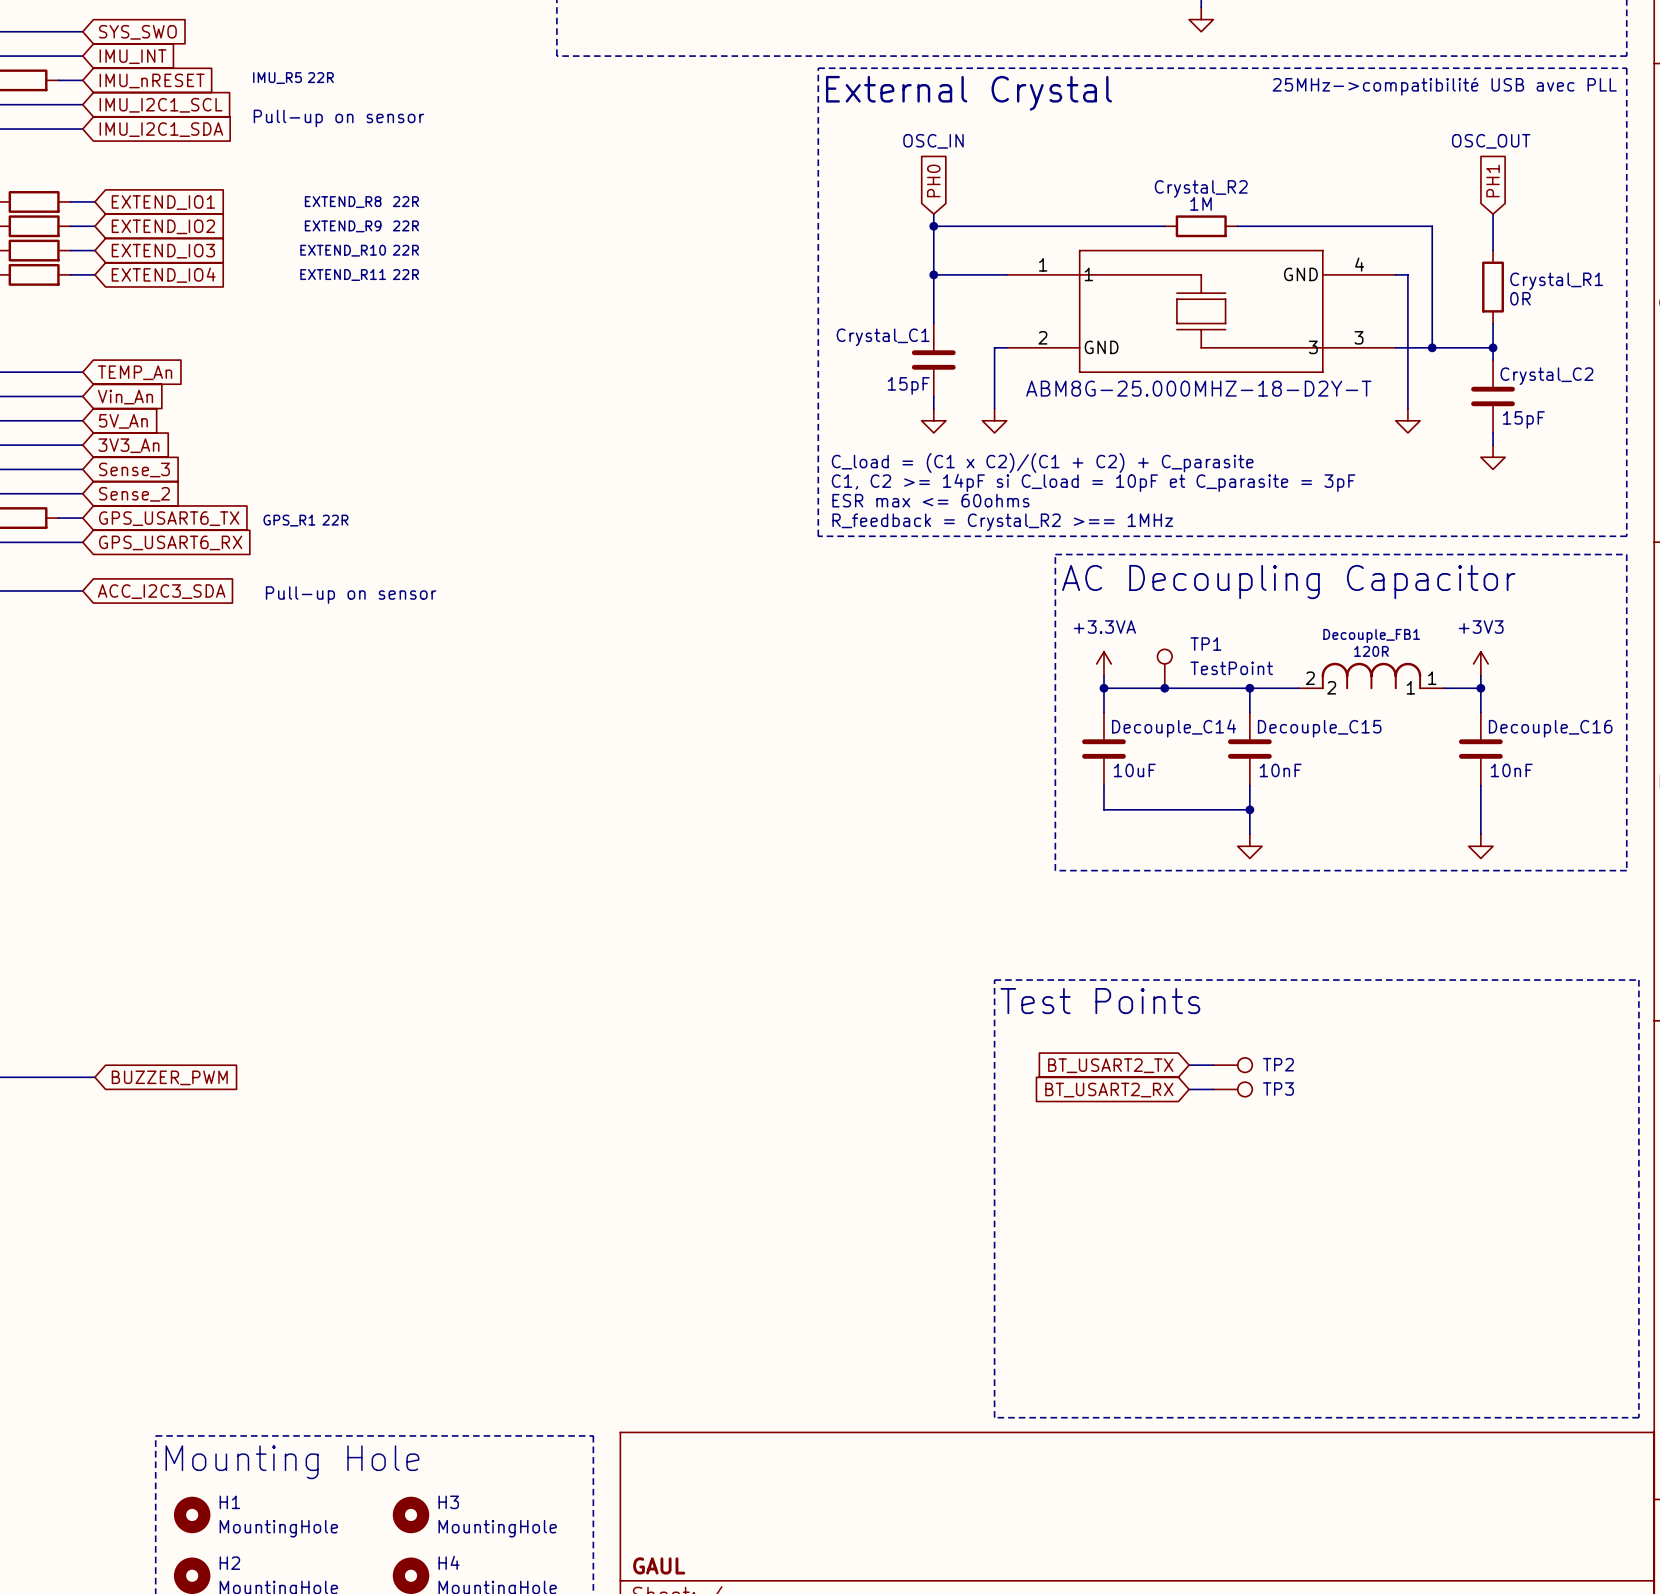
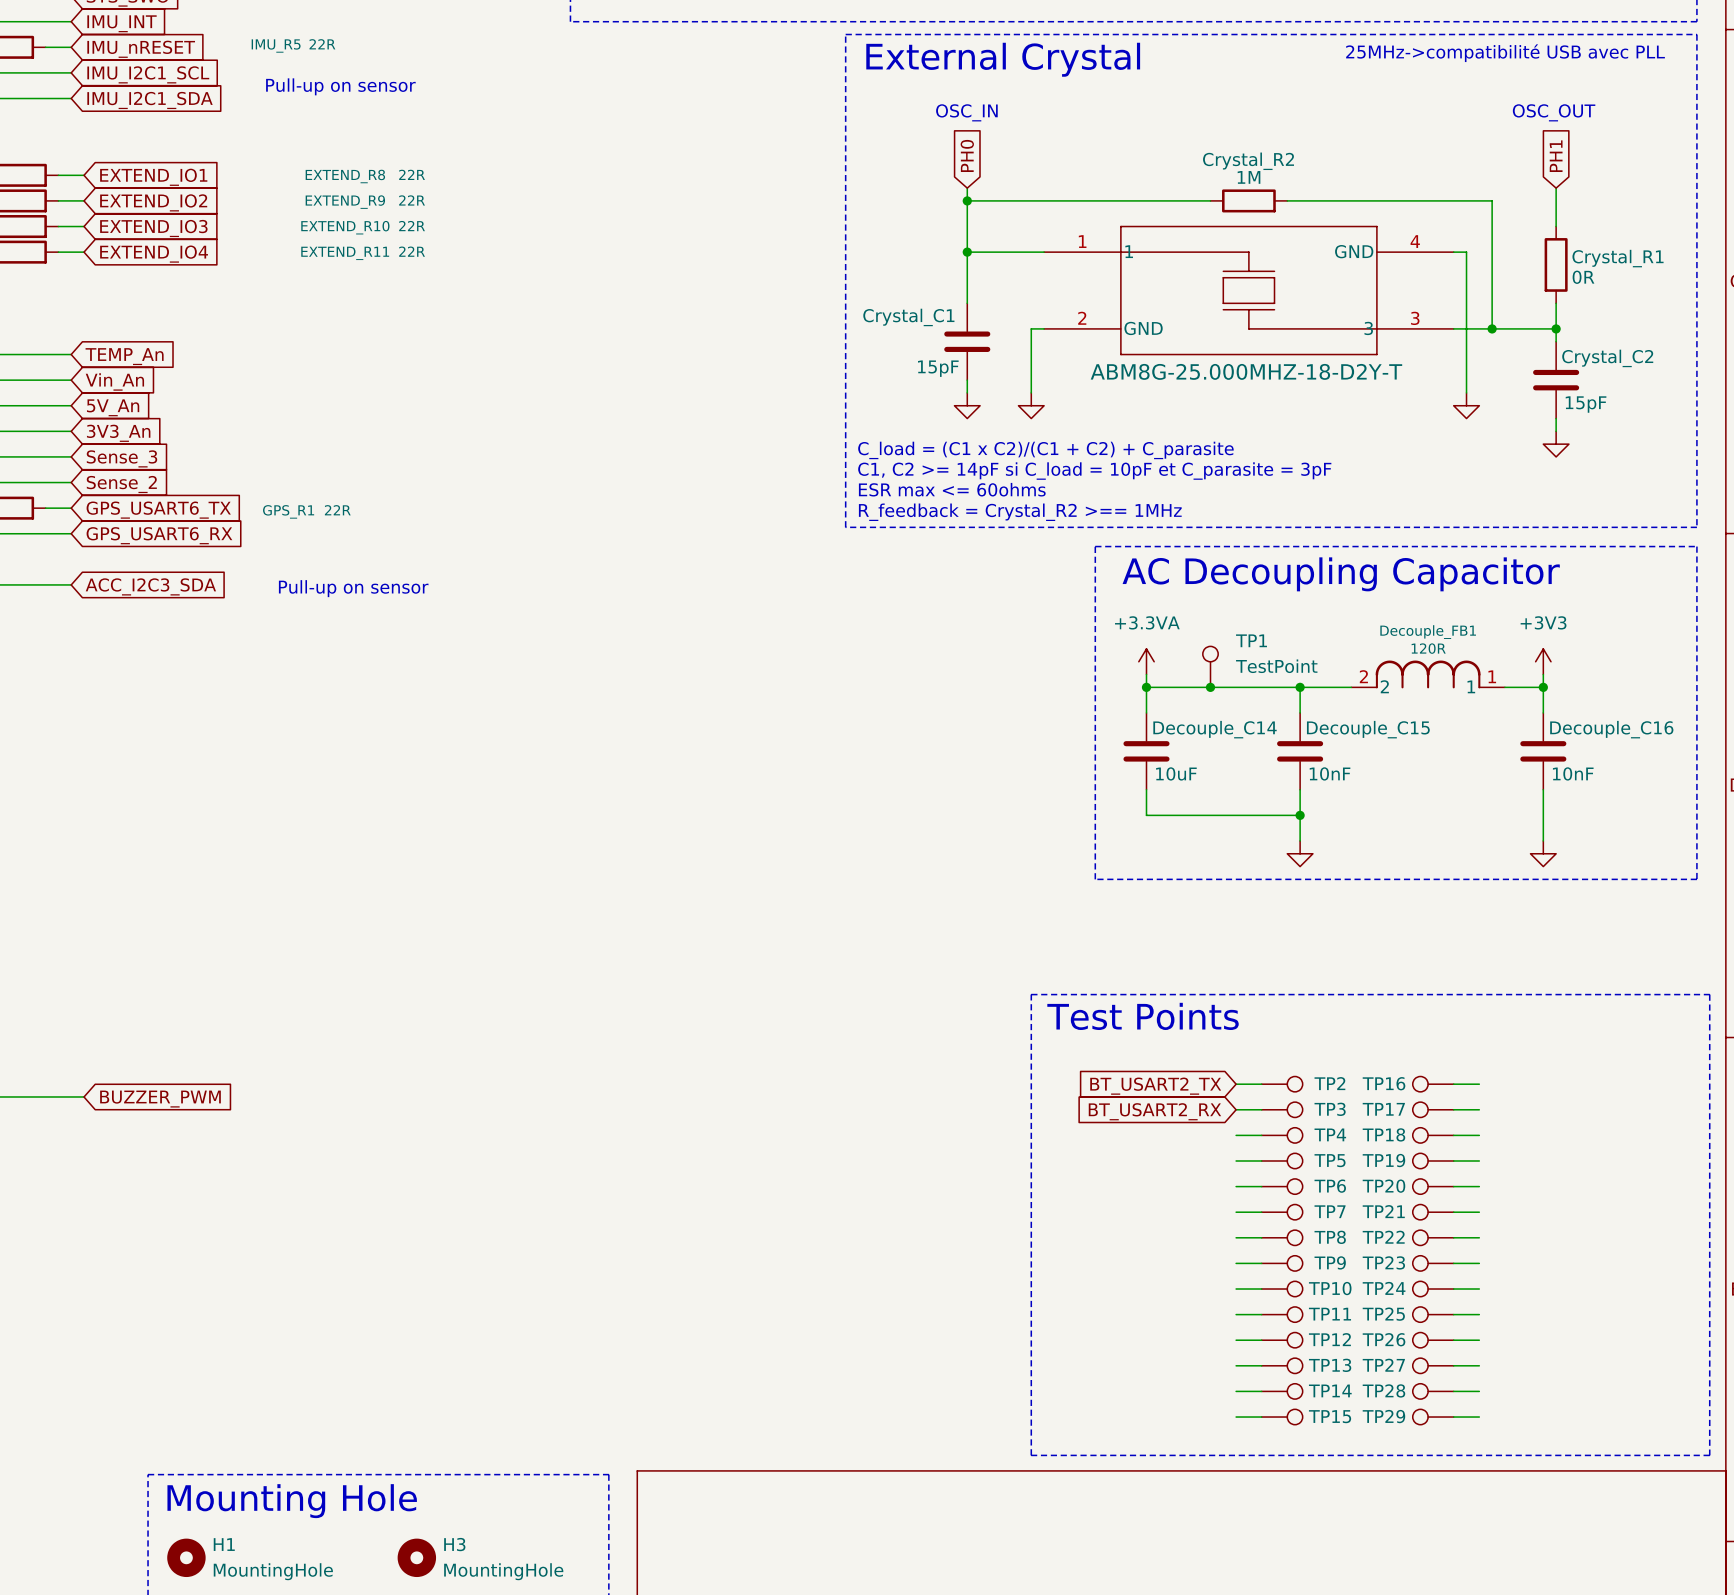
TP16: none -> (1433, 1084)
wire: none -> (1453, 1084) (1479, 1084)
TP17: none -> (1433, 1109)
wire: none -> (1453, 1109) (1479, 1109)
wire: none -> (1236, 1135) (1261, 1135)
TP4: none -> (1282, 1135)
TP18: none -> (1433, 1135)
wire: none -> (1453, 1135) (1479, 1135)
wire: none -> (1236, 1160) (1261, 1160)
TP5: none -> (1282, 1160)
TP19: none -> (1433, 1160)
wire: none -> (1453, 1160) (1479, 1160)
wire: none -> (1236, 1186) (1261, 1186)
TP6: none -> (1282, 1186)
TP20: none -> (1433, 1186)
wire: none -> (1453, 1186) (1479, 1186)
wire: none -> (1236, 1212) (1261, 1212)
TP7: none -> (1282, 1212)
TP21: none -> (1433, 1212)
wire: none -> (1453, 1212) (1479, 1212)
wire: none -> (1236, 1237) (1261, 1237)
TP8: none -> (1282, 1237)
TP22: none -> (1433, 1237)
wire: none -> (1453, 1237) (1479, 1237)
wire: none -> (1236, 1263) (1261, 1263)
TP9: none -> (1282, 1263)
TP23: none -> (1433, 1263)
wire: none -> (1453, 1263) (1479, 1263)
wire: none -> (1236, 1289) (1261, 1289)
TP10: none -> (1282, 1289)
TP24: none -> (1433, 1289)
wire: none -> (1453, 1289) (1479, 1289)
wire: none -> (1236, 1314) (1261, 1314)
TP11: none -> (1282, 1314)
TP25: none -> (1433, 1314)
wire: none -> (1453, 1314) (1479, 1314)
wire: none -> (1236, 1340) (1261, 1340)
TP12: none -> (1282, 1340)
TP26: none -> (1433, 1340)
wire: none -> (1453, 1340) (1479, 1340)
wire: none -> (1236, 1365) (1261, 1365)
TP13: none -> (1282, 1365)
TP27: none -> (1433, 1365)
wire: none -> (1453, 1365) (1479, 1365)
wire: none -> (1236, 1391) (1261, 1391)
TP14: none -> (1282, 1391)
TP28: none -> (1433, 1391)
wire: none -> (1453, 1391) (1479, 1391)
wire: none -> (1236, 1417) (1261, 1417)
TP15: none -> (1282, 1417)
TP29: none -> (1433, 1417)
wire: none -> (1453, 1417) (1479, 1417)

